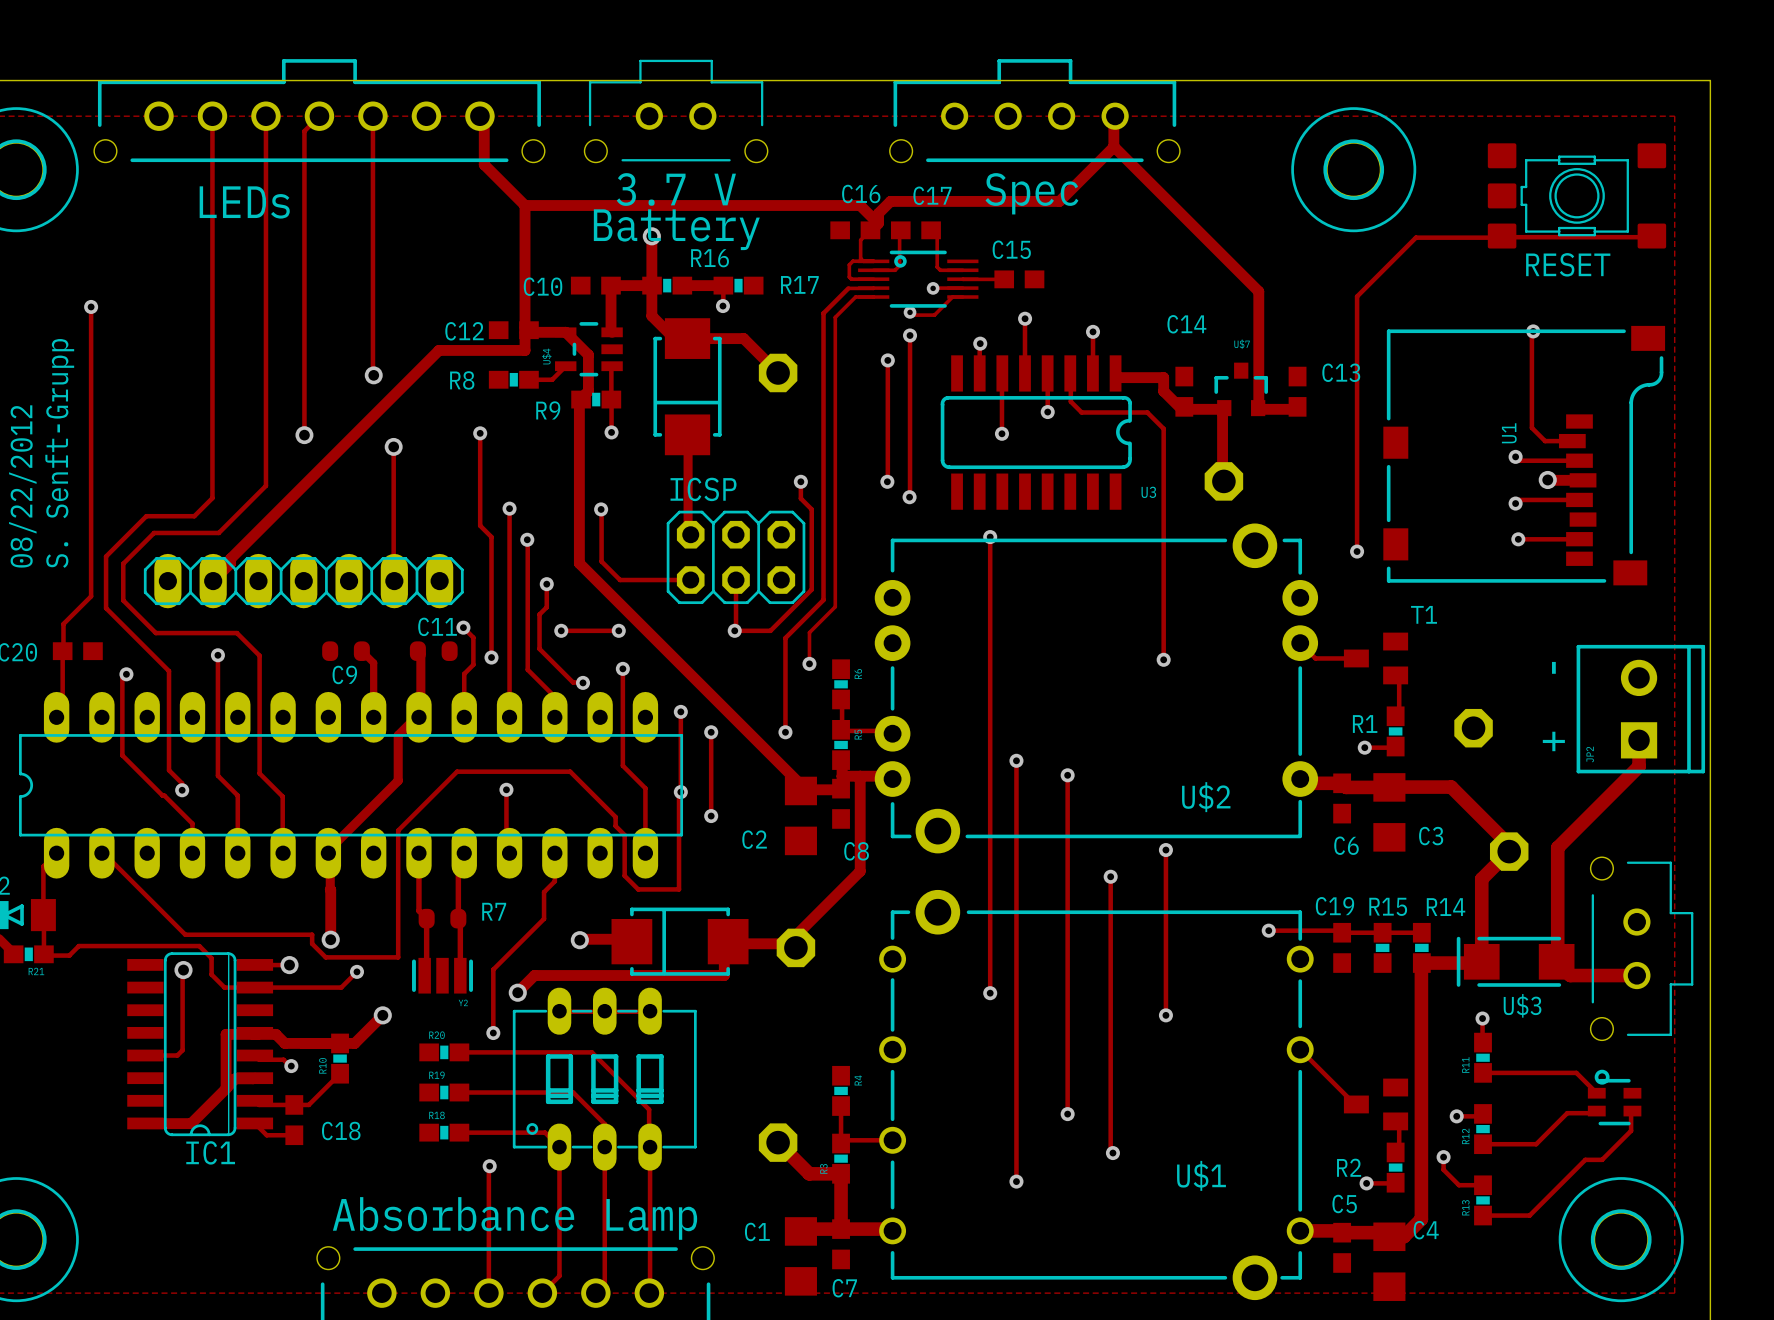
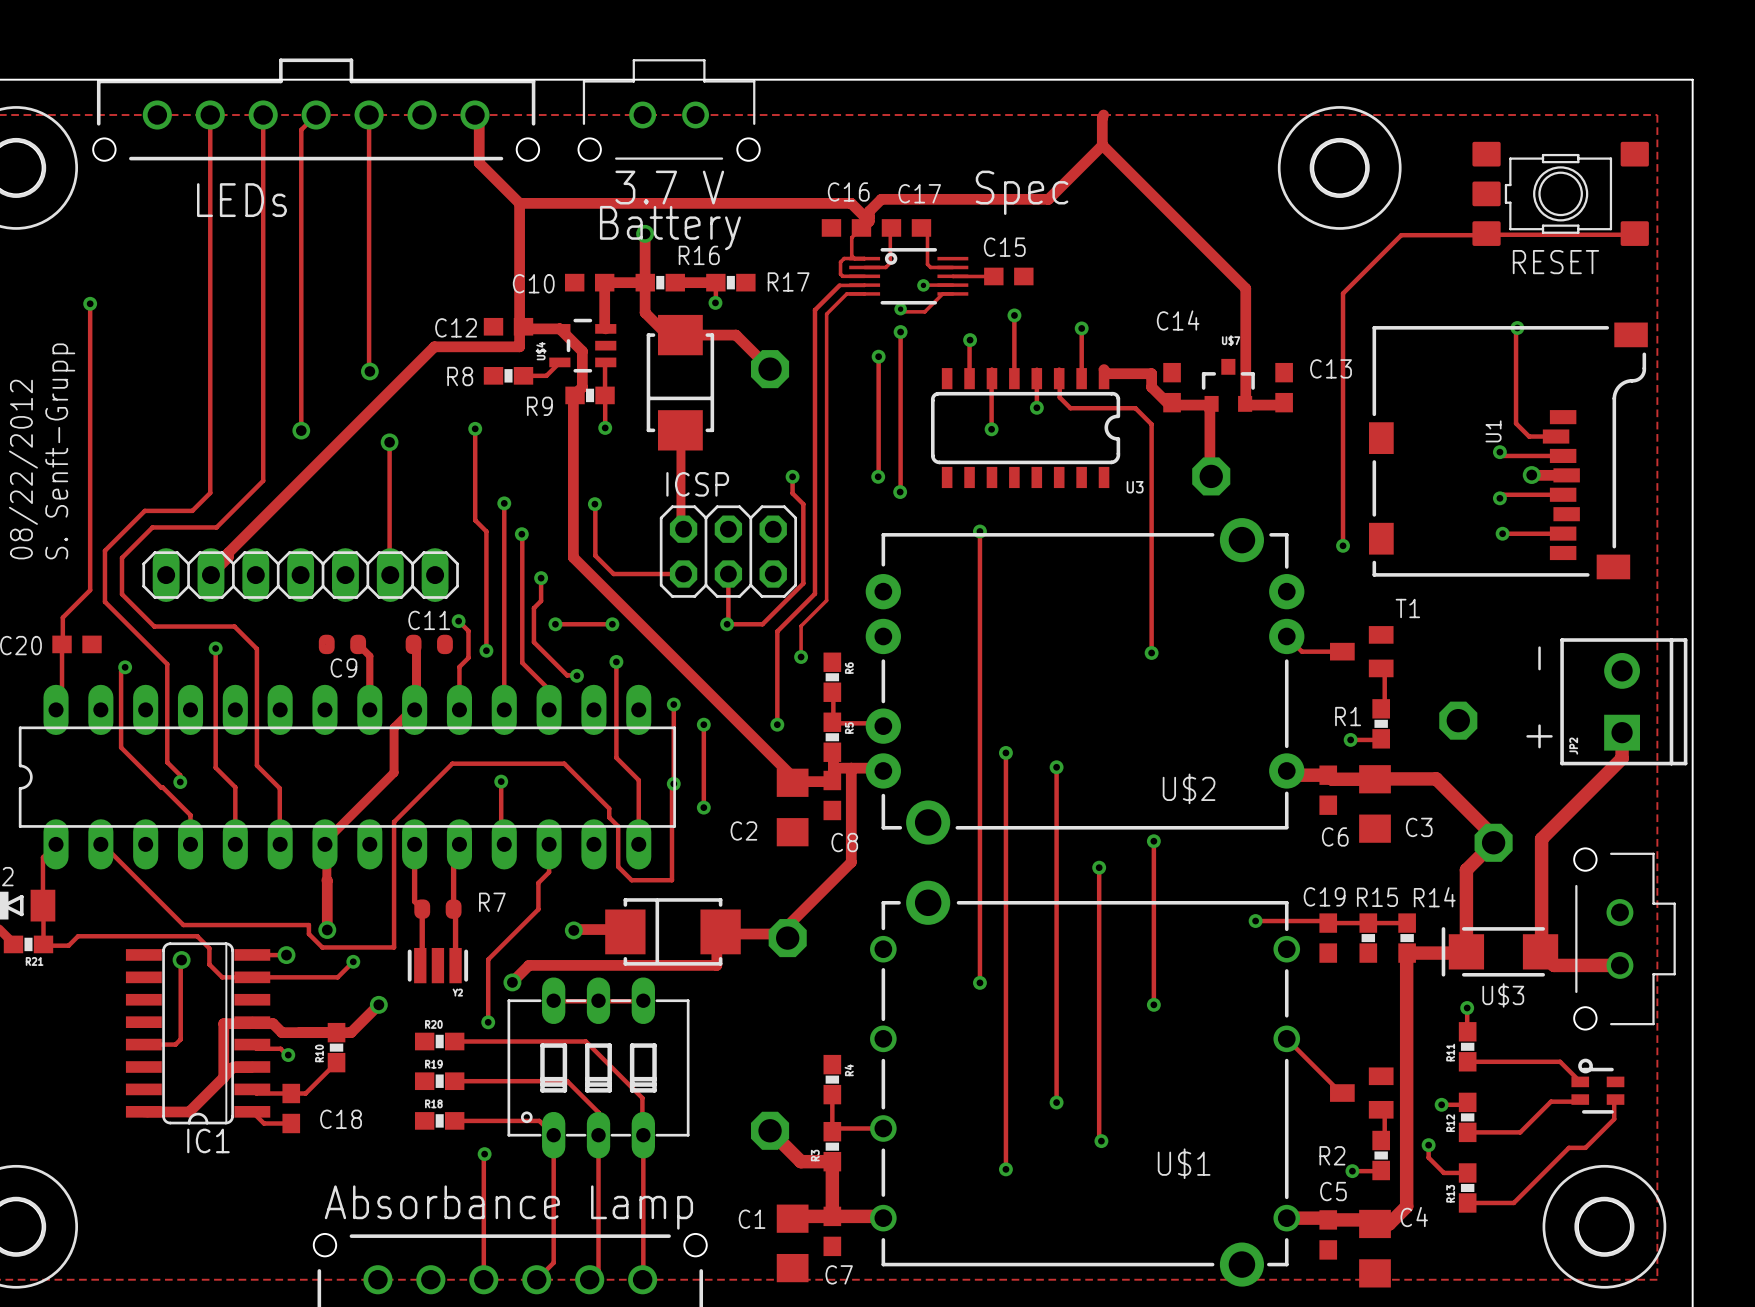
part: (1034, 110) -> none
U3 footprint: [940, 355, 1132, 510] -> [930, 368, 1121, 489]

